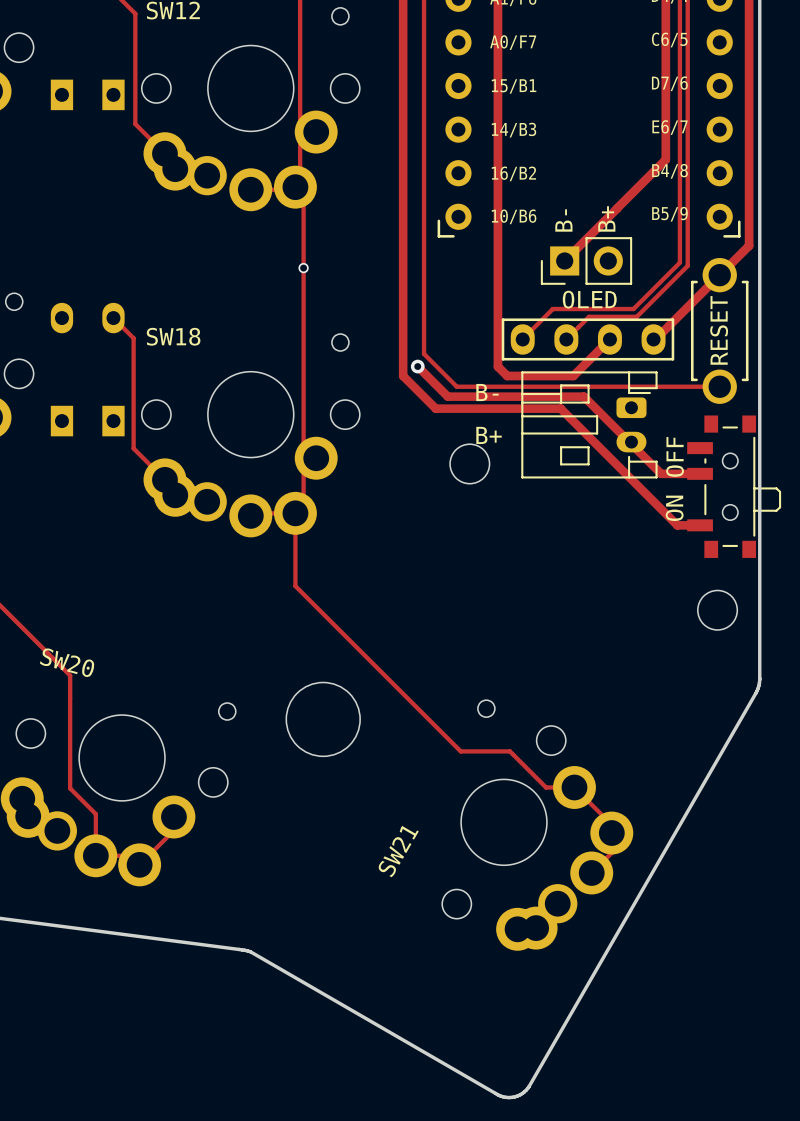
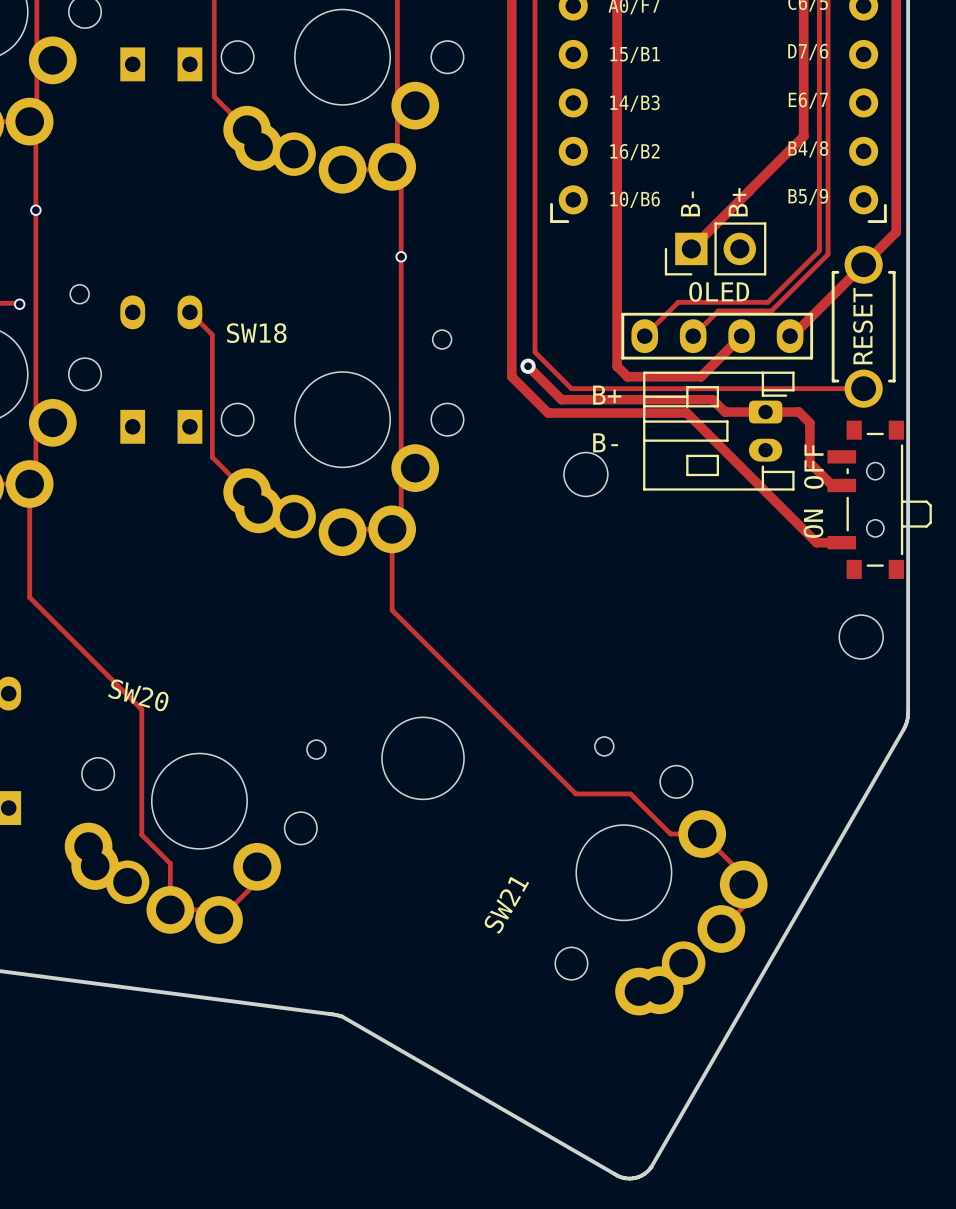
text: B- (487, 392) -> B+ (607, 395)
track: (595, 407) (661, 473) (691, 473) -> (725, 412) (798, 412) (809, 423) (809, 463) (832, 485)
text: B+ (489, 435) -> B- (605, 442)

